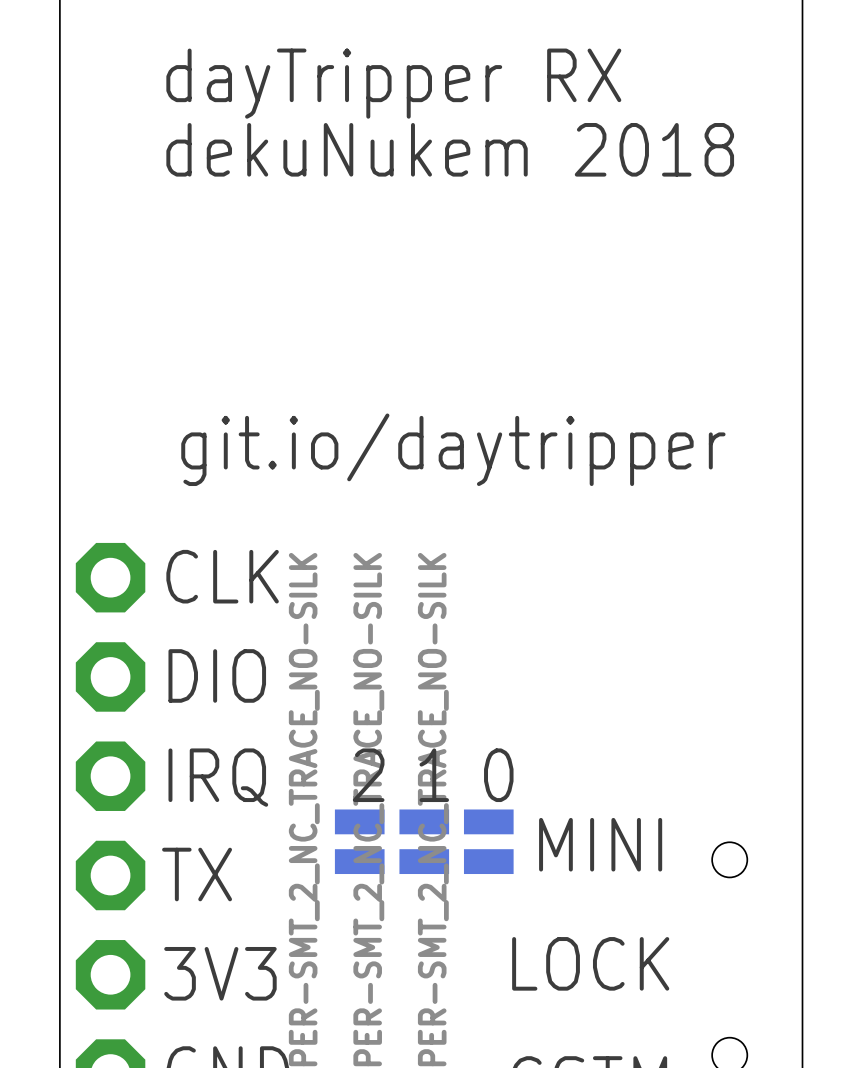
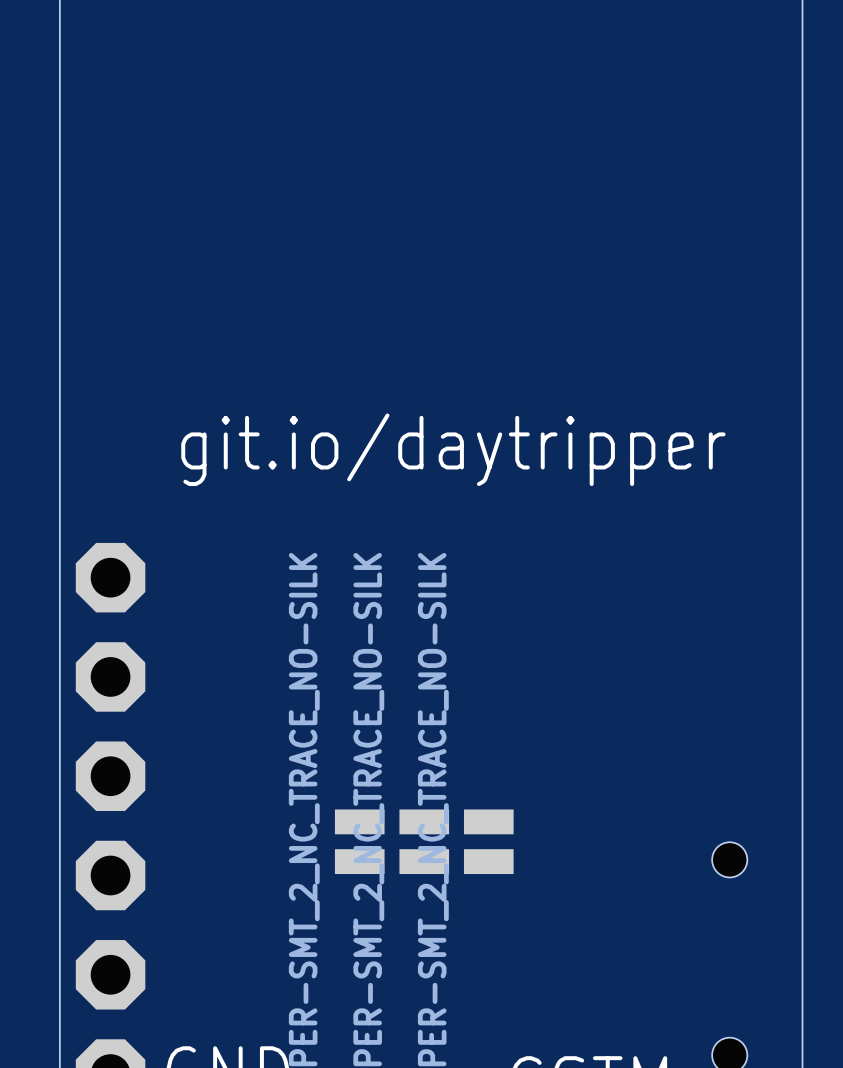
text: dayTripper RX (393, 83) -> none
text: dekuNukem 2018 (450, 149) -> none
text: CLK (222, 576) -> none
text: DIO (217, 675) -> none
text: 2 (368, 775) -> none
text: 1 (434, 775) -> none
text: 0 (498, 775) -> none
text: IRQ (218, 777) -> none
text: MINI (600, 844) -> none
text: TX (197, 874) -> none
text: LOCK (590, 963) -> none
text: 3V3 (220, 973) -> none

